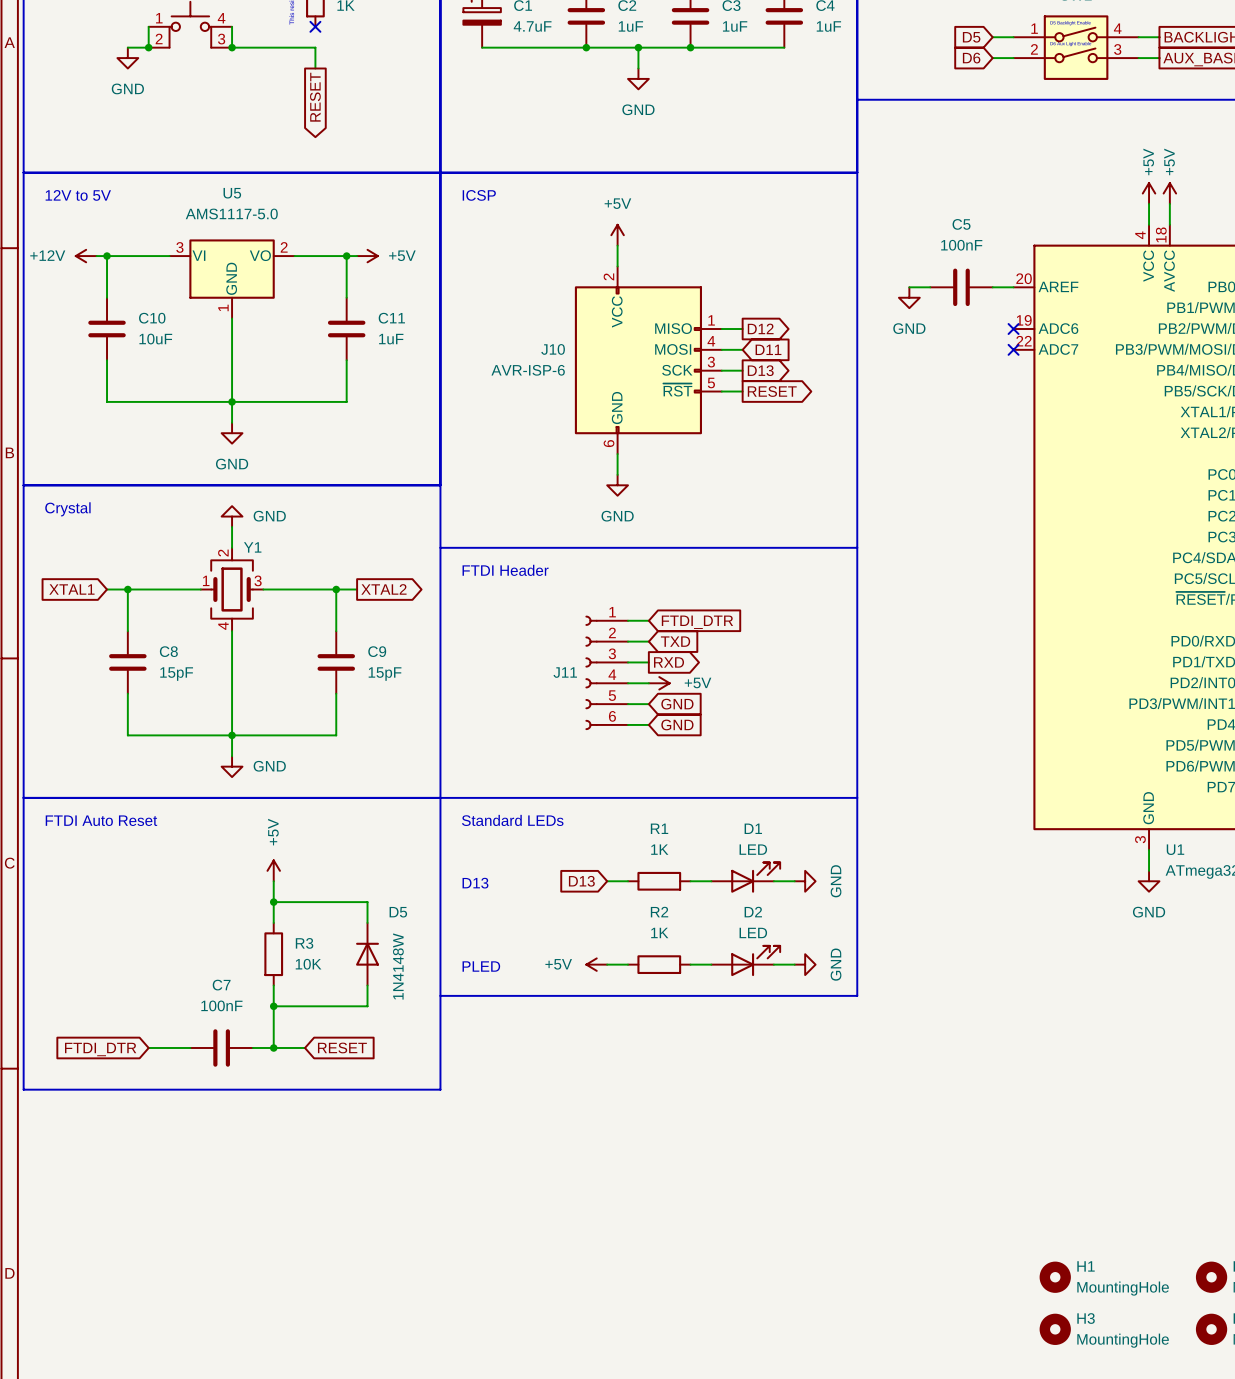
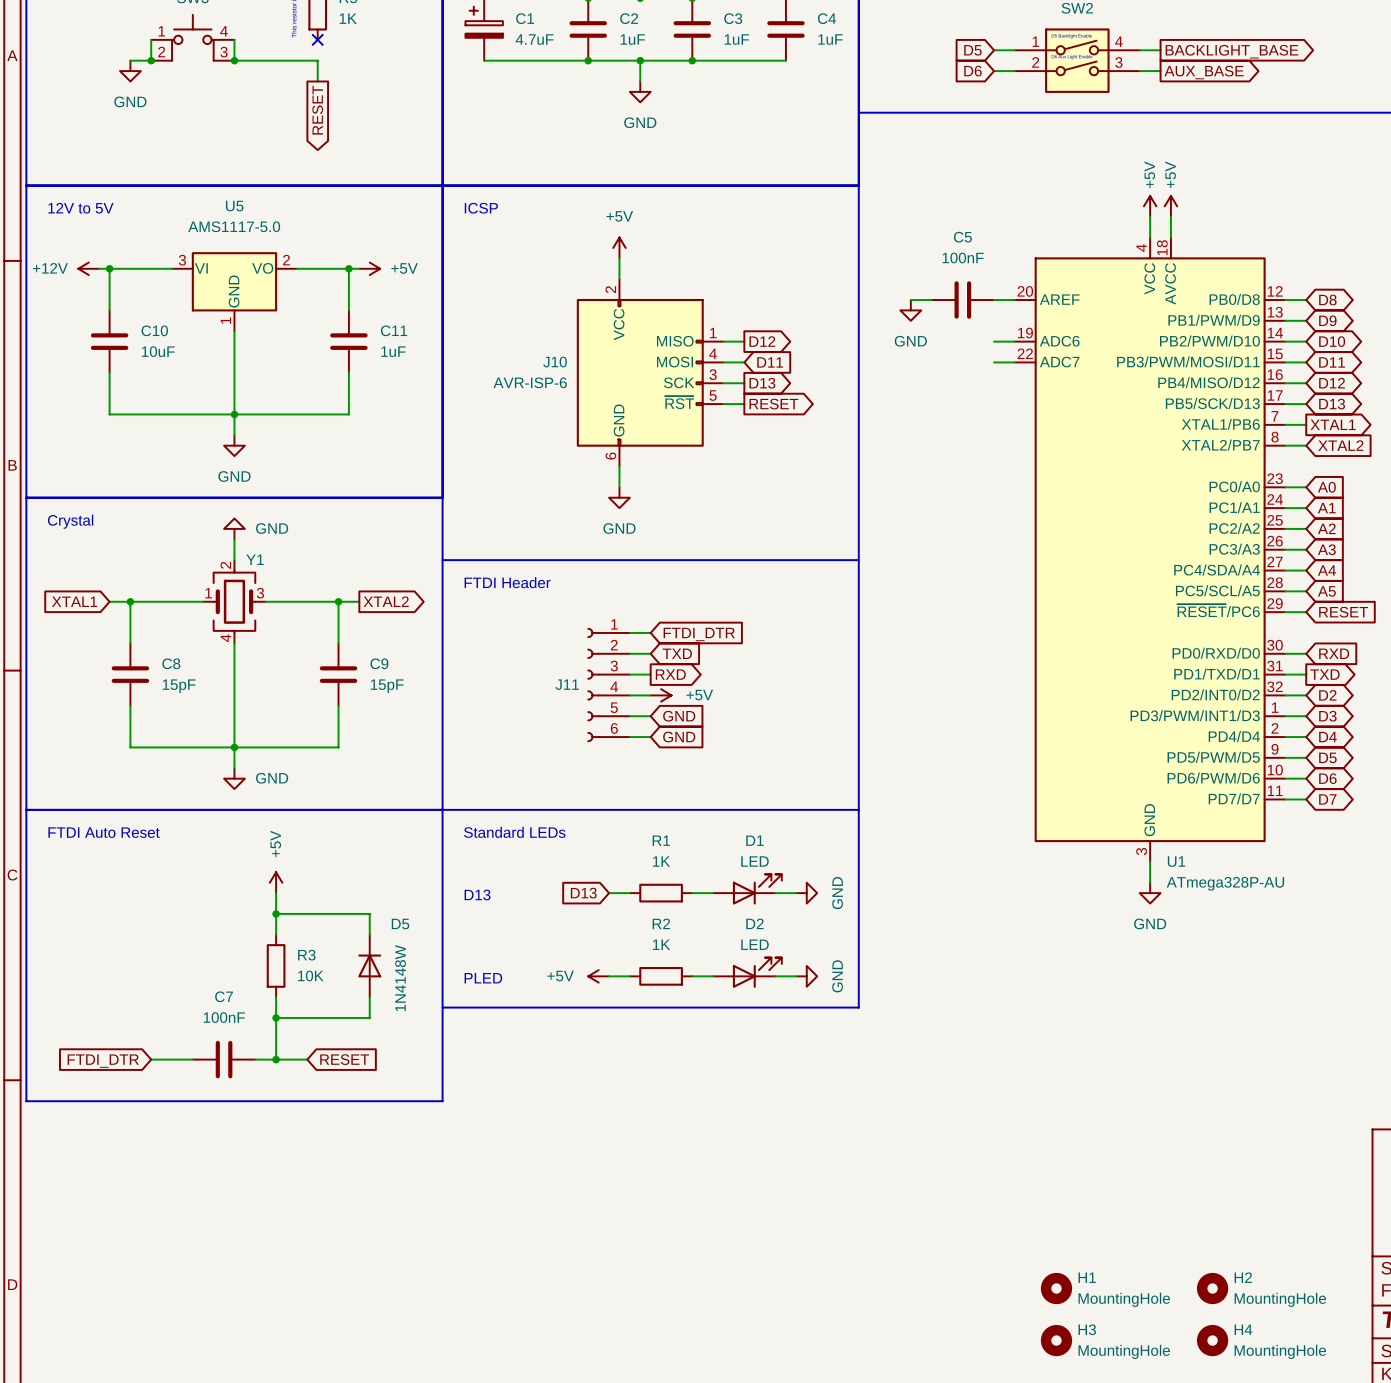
wire: none -> (994, 341) (1014, 341)
no-connect mark: (1013, 329) -> none
wire: none -> (994, 362) (1014, 362)
no-connect mark: (1013, 349) -> none

